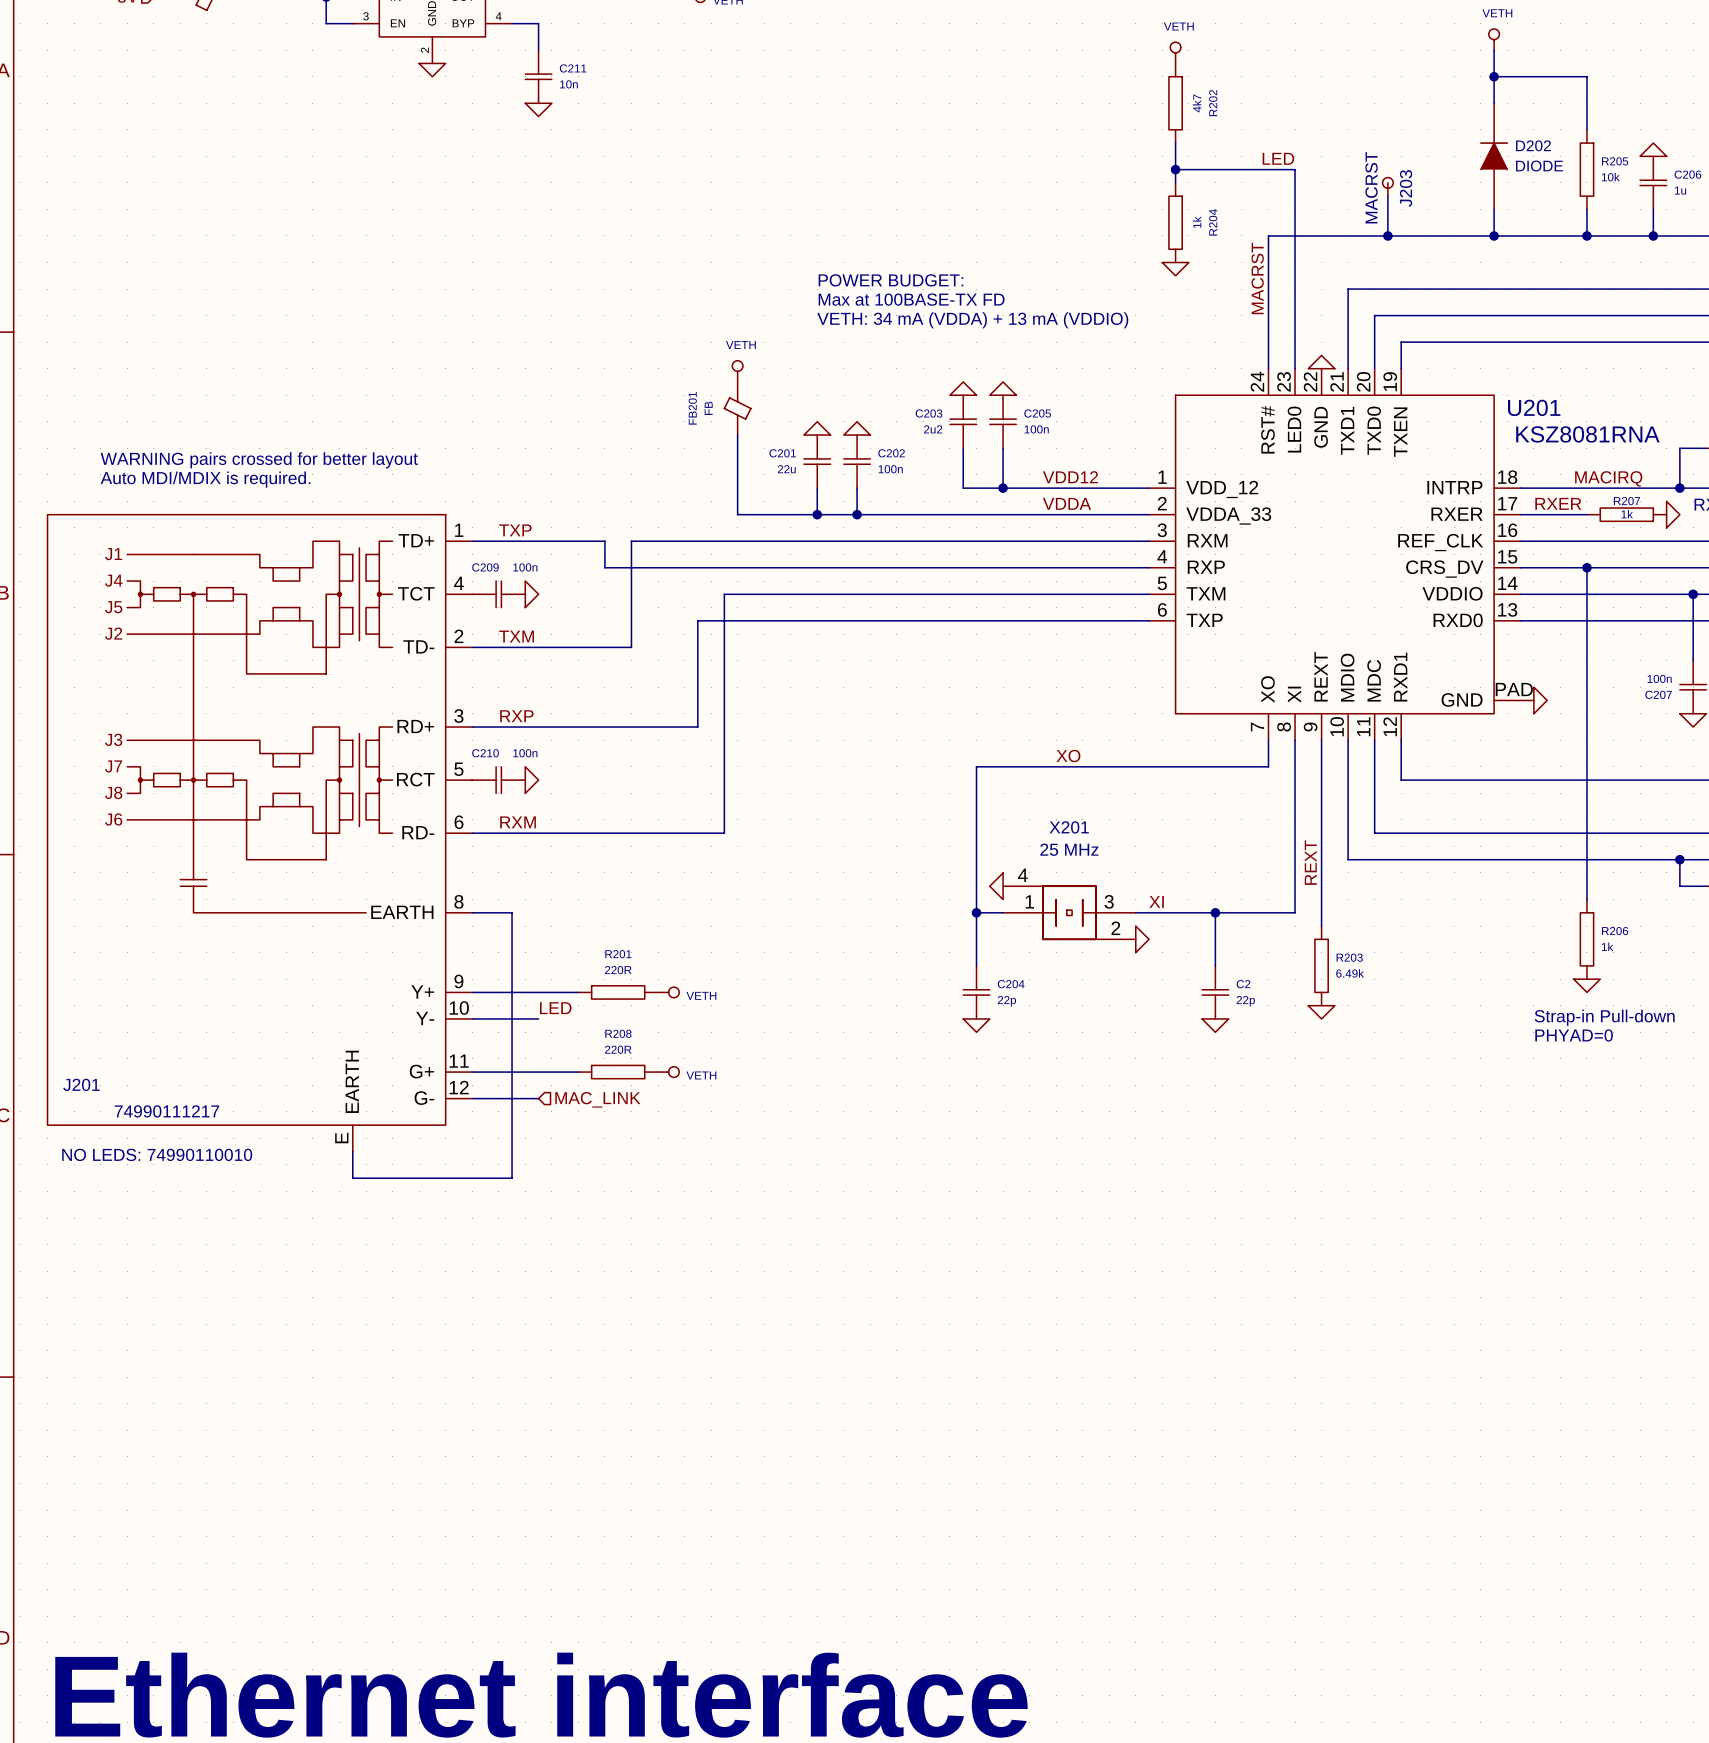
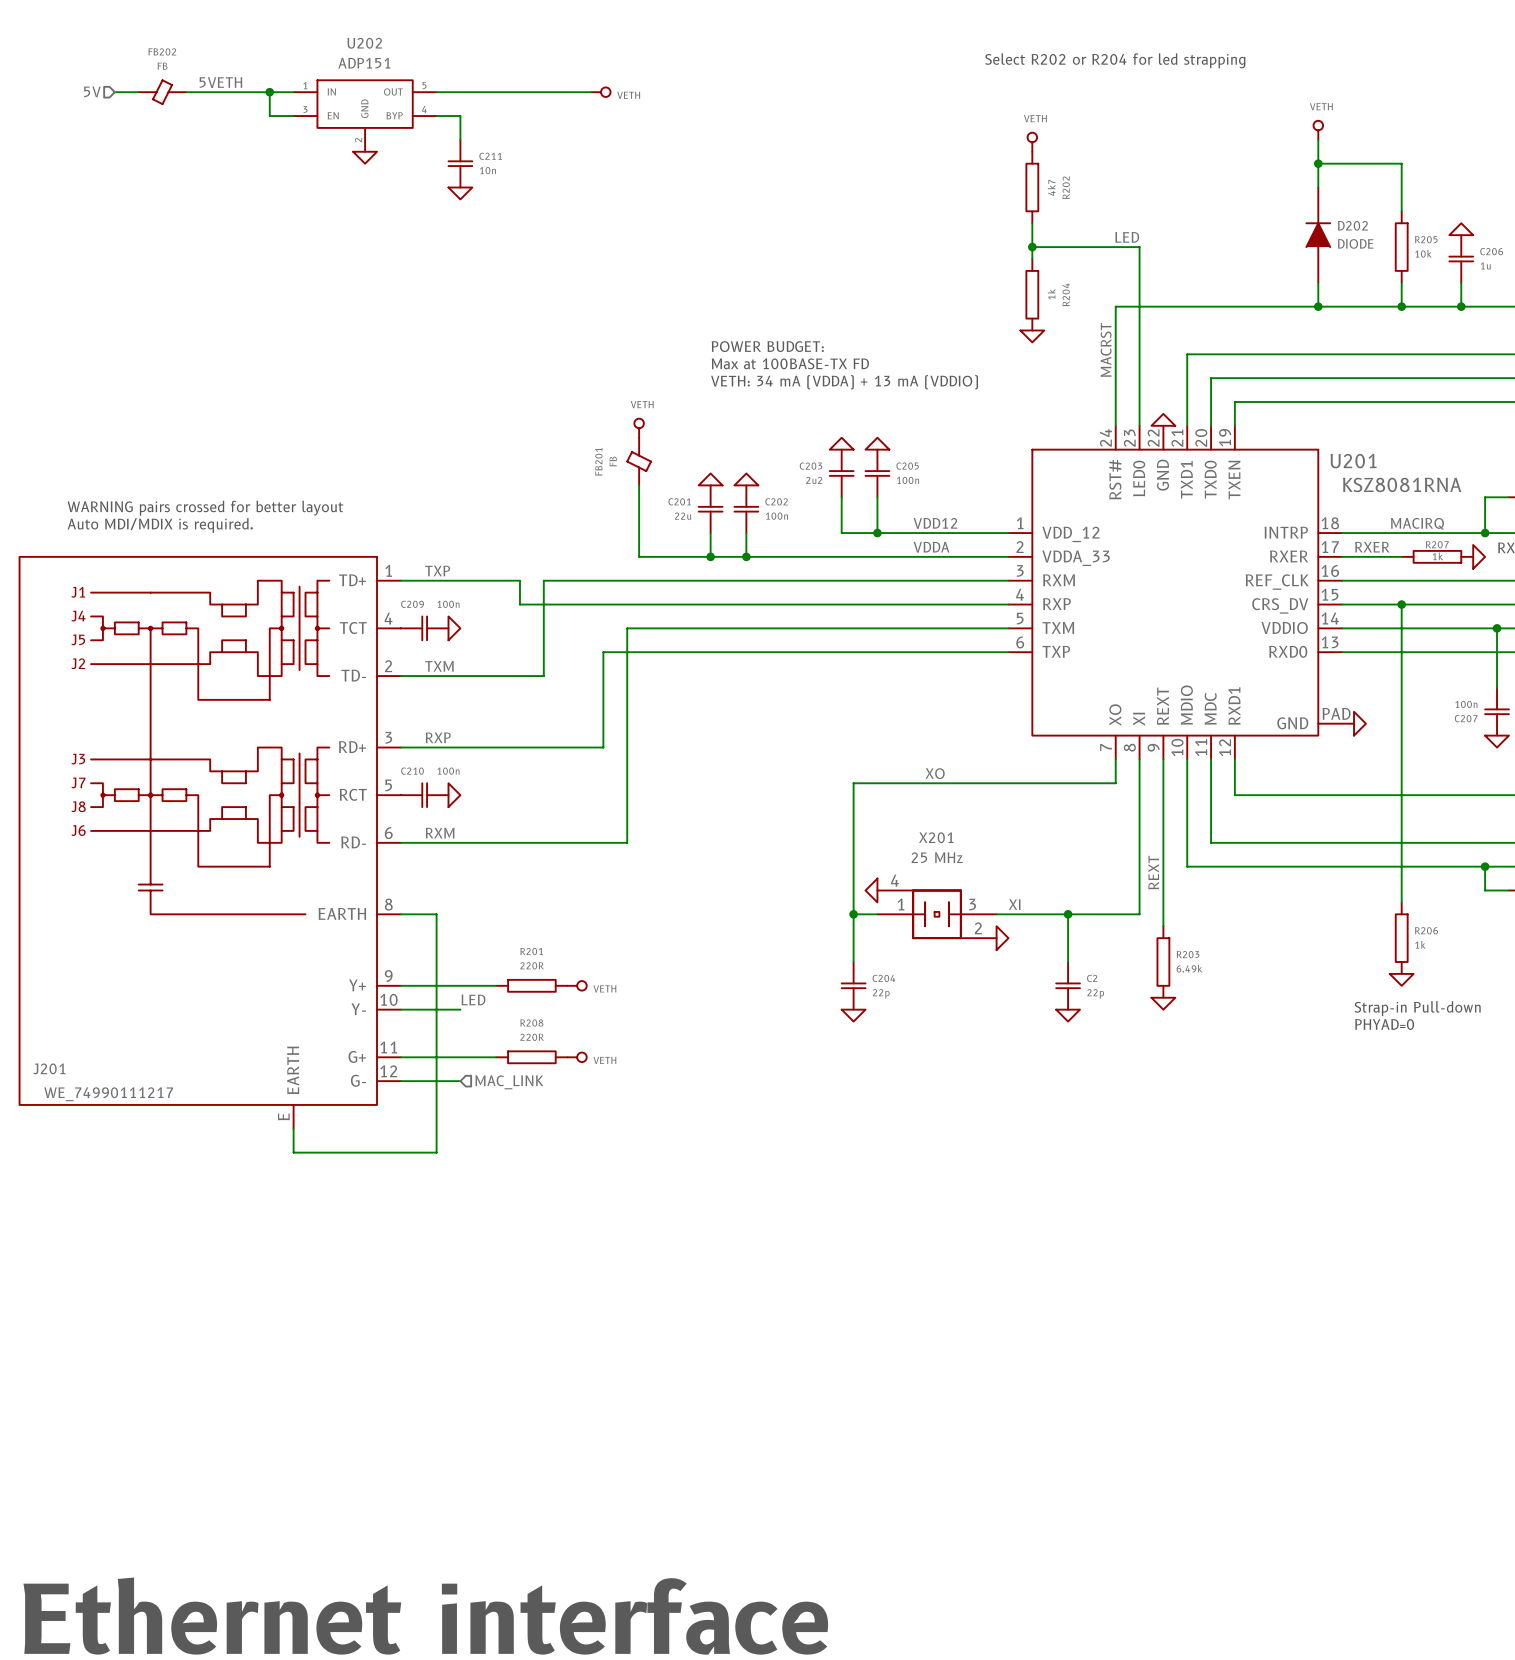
J203: MACRST (1387, 186) -> none
wire: (1387, 196) (1387, 235) -> none
junction: (1387, 235) -> none
J201 value: 74990111217 (166, 1111) -> WE_74990111217 (108, 1094)
text: NO LEDS: 74990110010 (157, 1154) -> none

